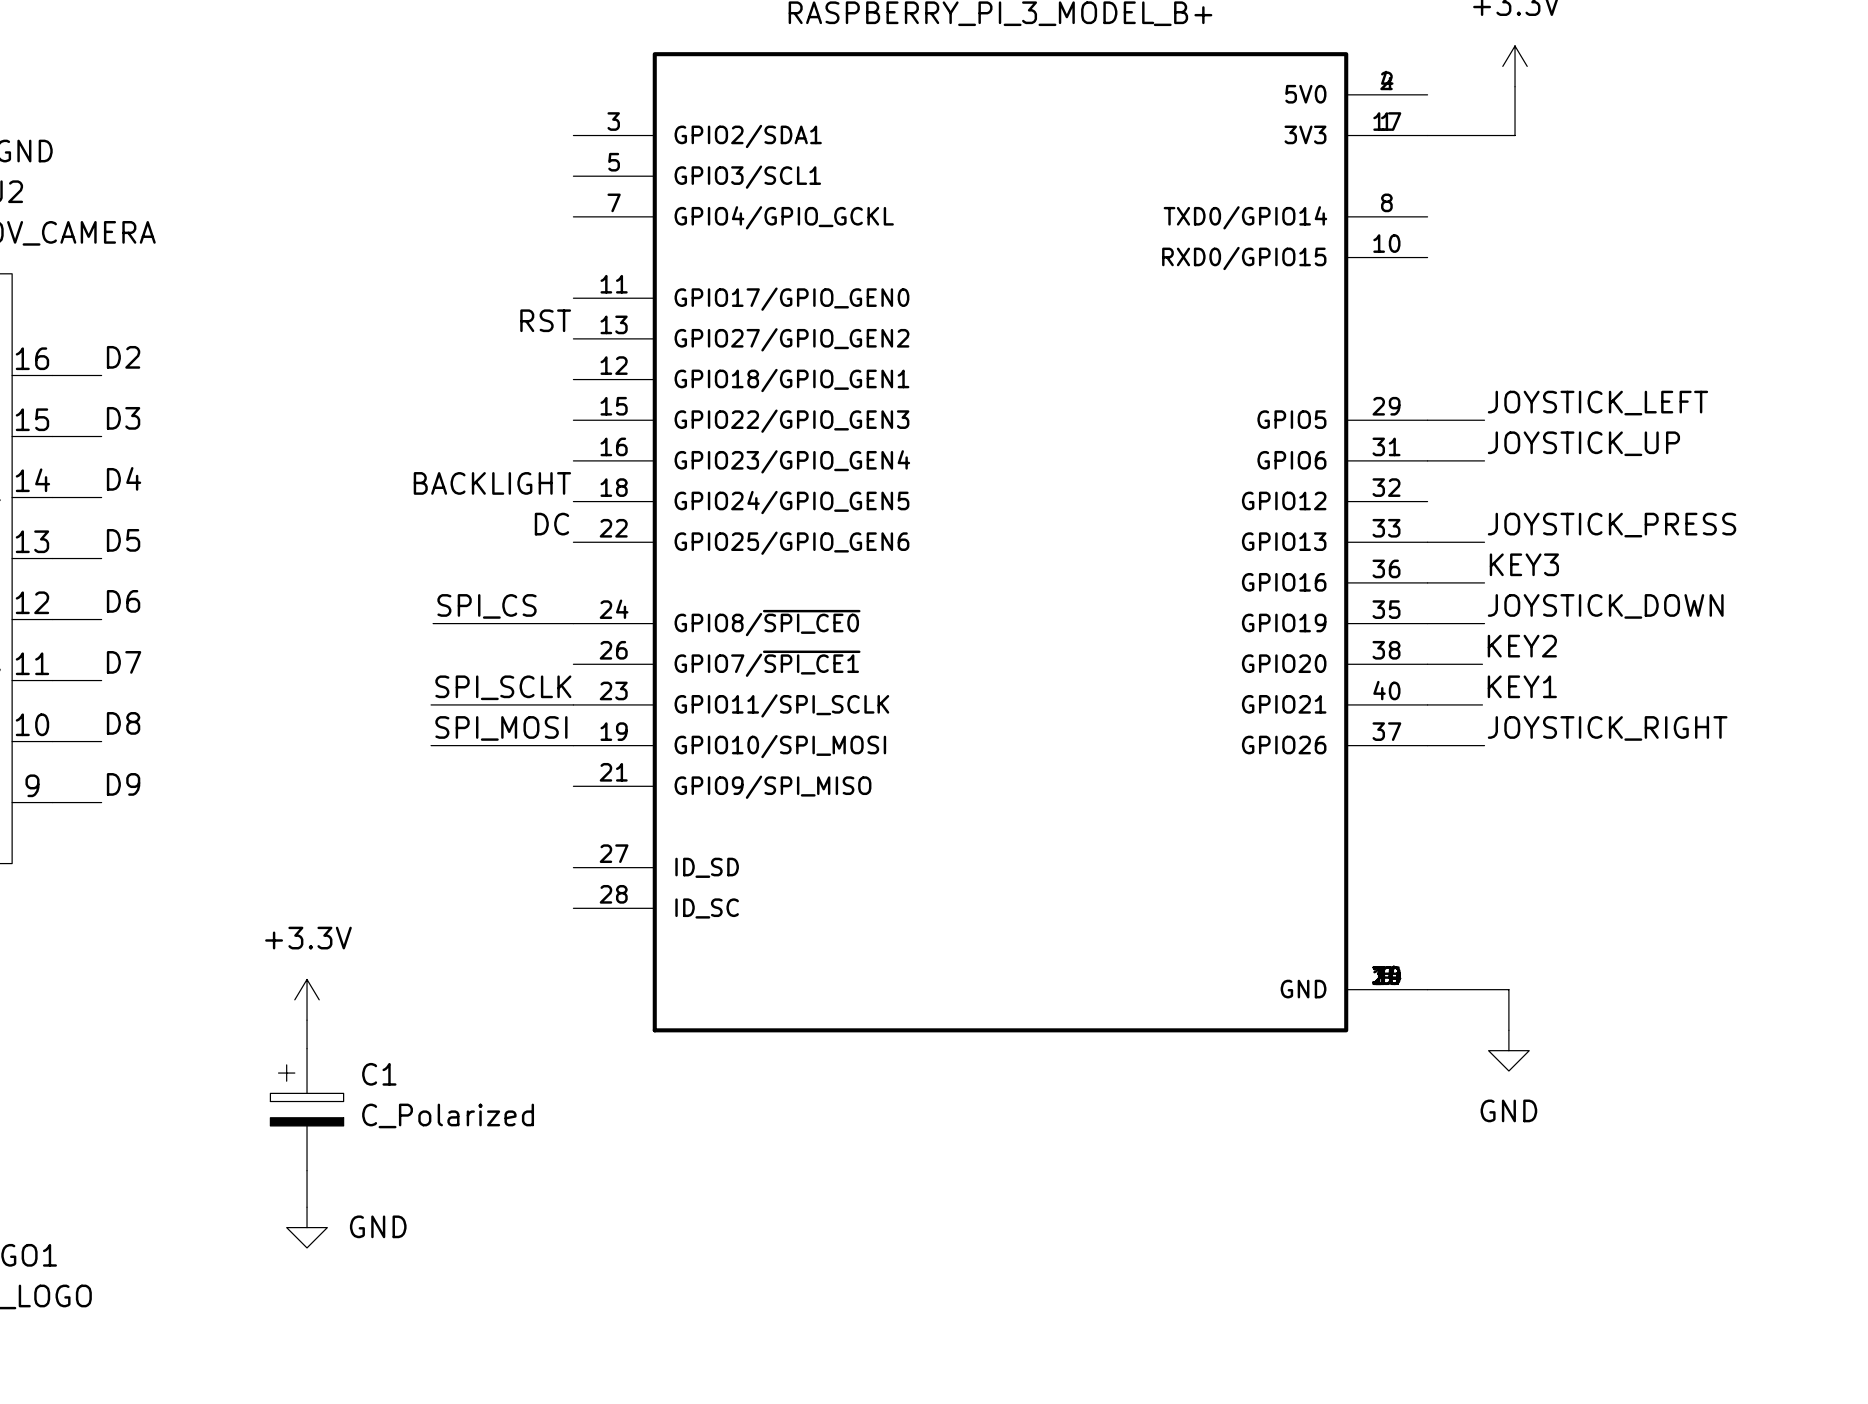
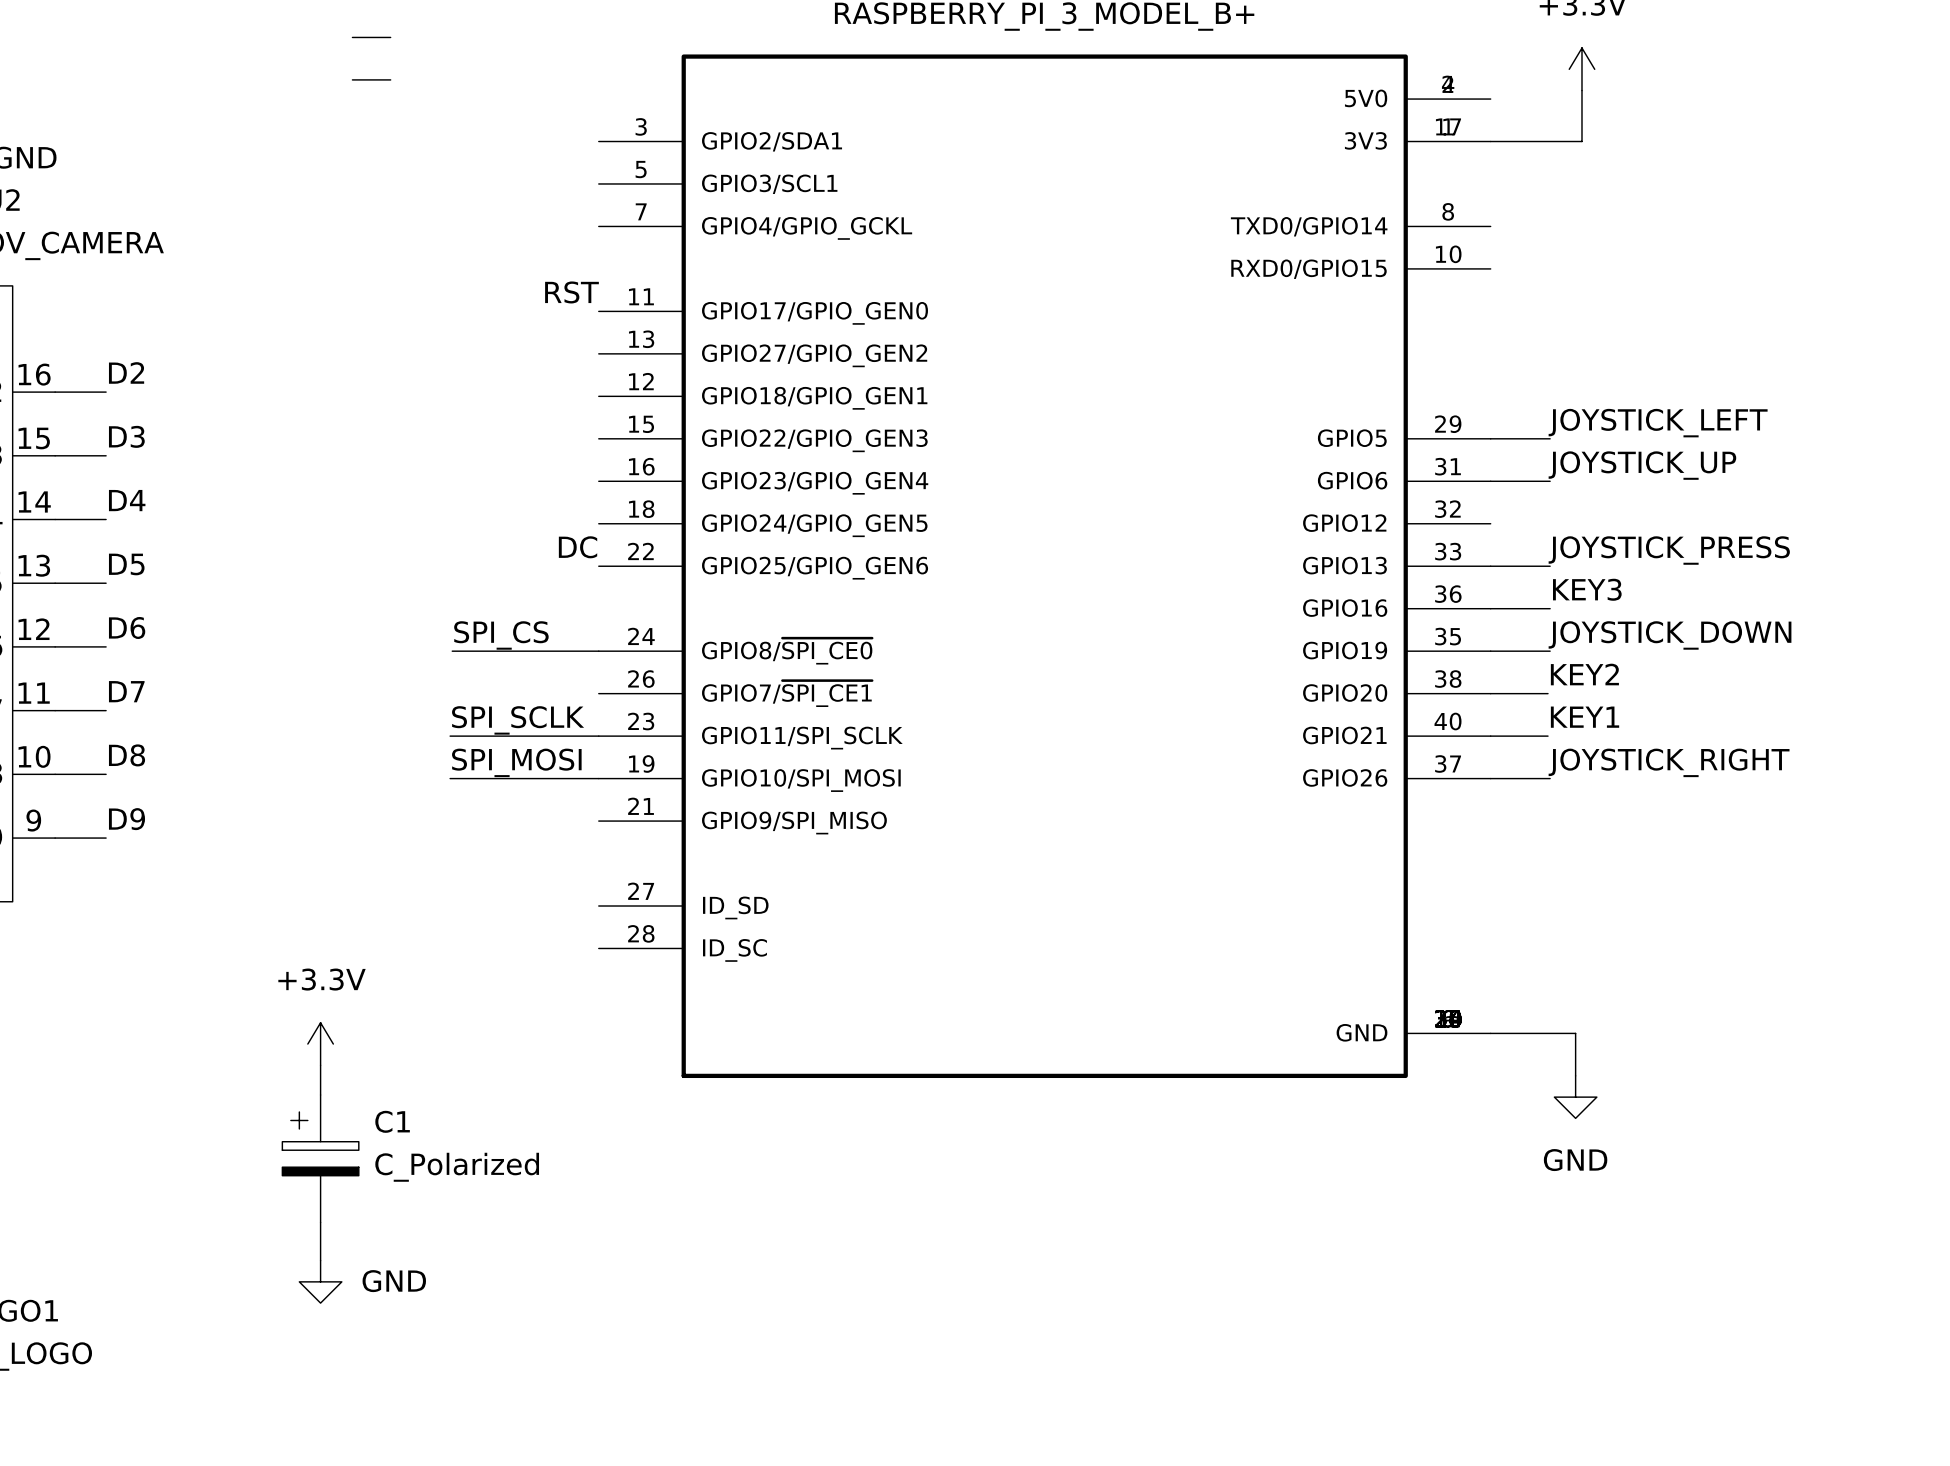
wire: none -> (352, 37) (390, 37)
wire: none -> (352, 79) (390, 79)
label position: RST (545, 320) -> RST (571, 292)
label: BACKLIGHT (492, 483) -> none

